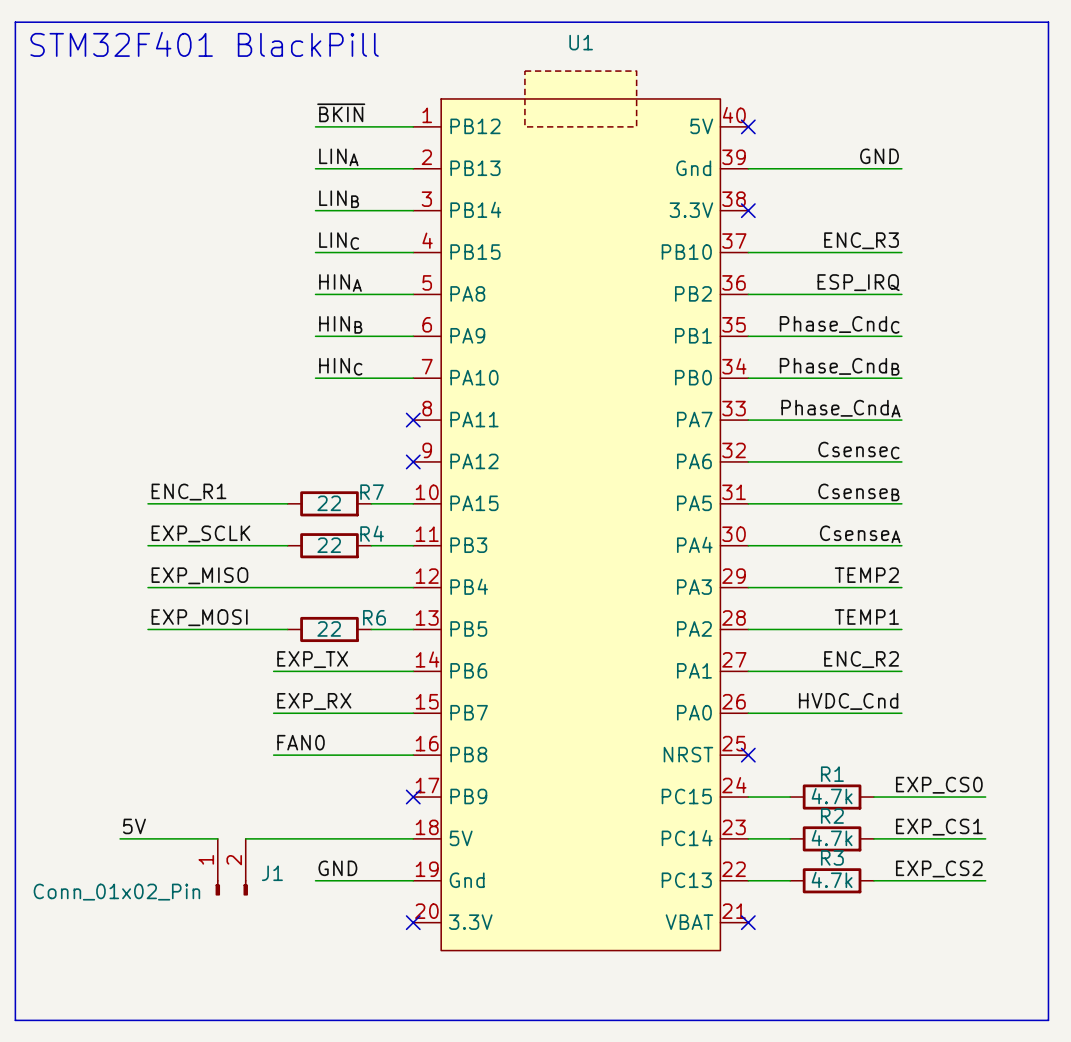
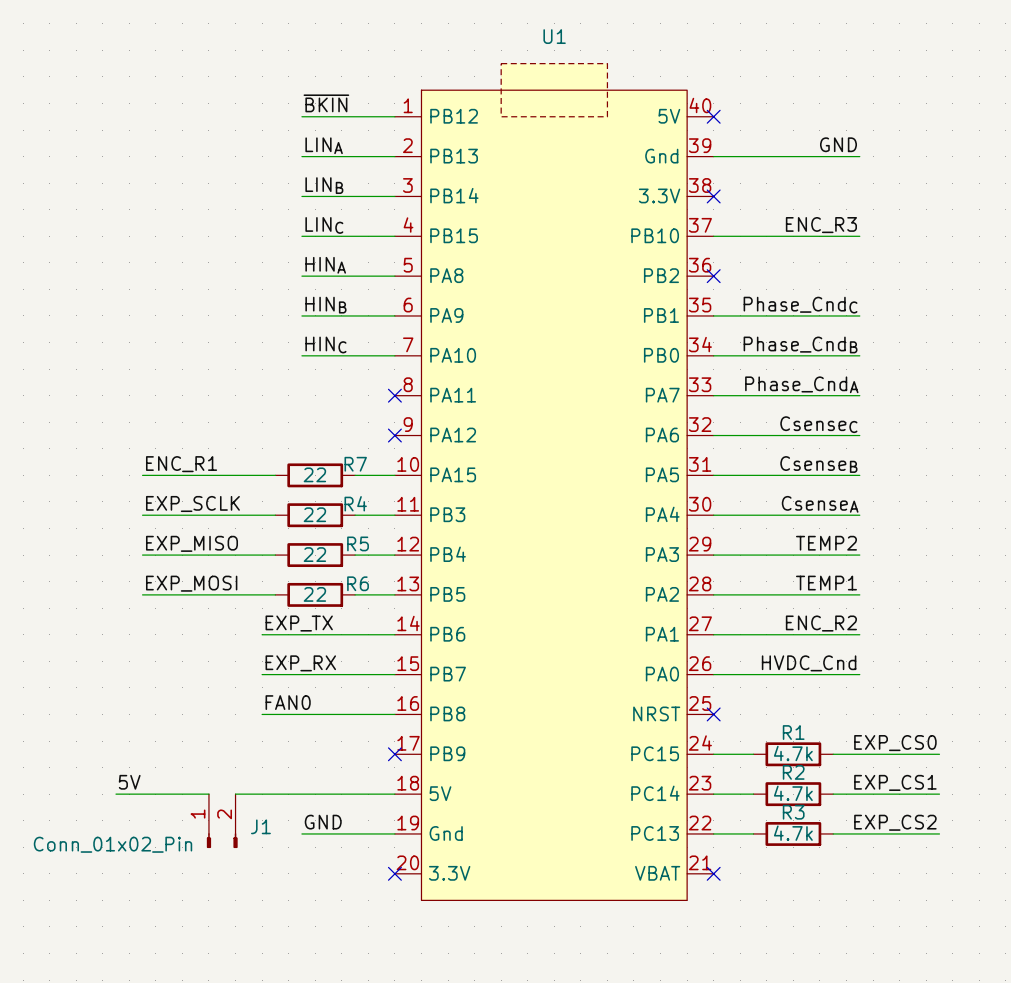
line: (15, 22) (1048, 22) (1048, 1020) (15, 1020) (15, 22) -> none
text: STM32F401 BlackPill (204, 44) -> none
label: ESP_IRQ (858, 282) -> none
wire: (748, 294) (901, 294) -> none
no-connect mark: none -> (713, 276)
wire: (287, 587) (371, 587) -> none
R5: none -> 22 (315, 555)

